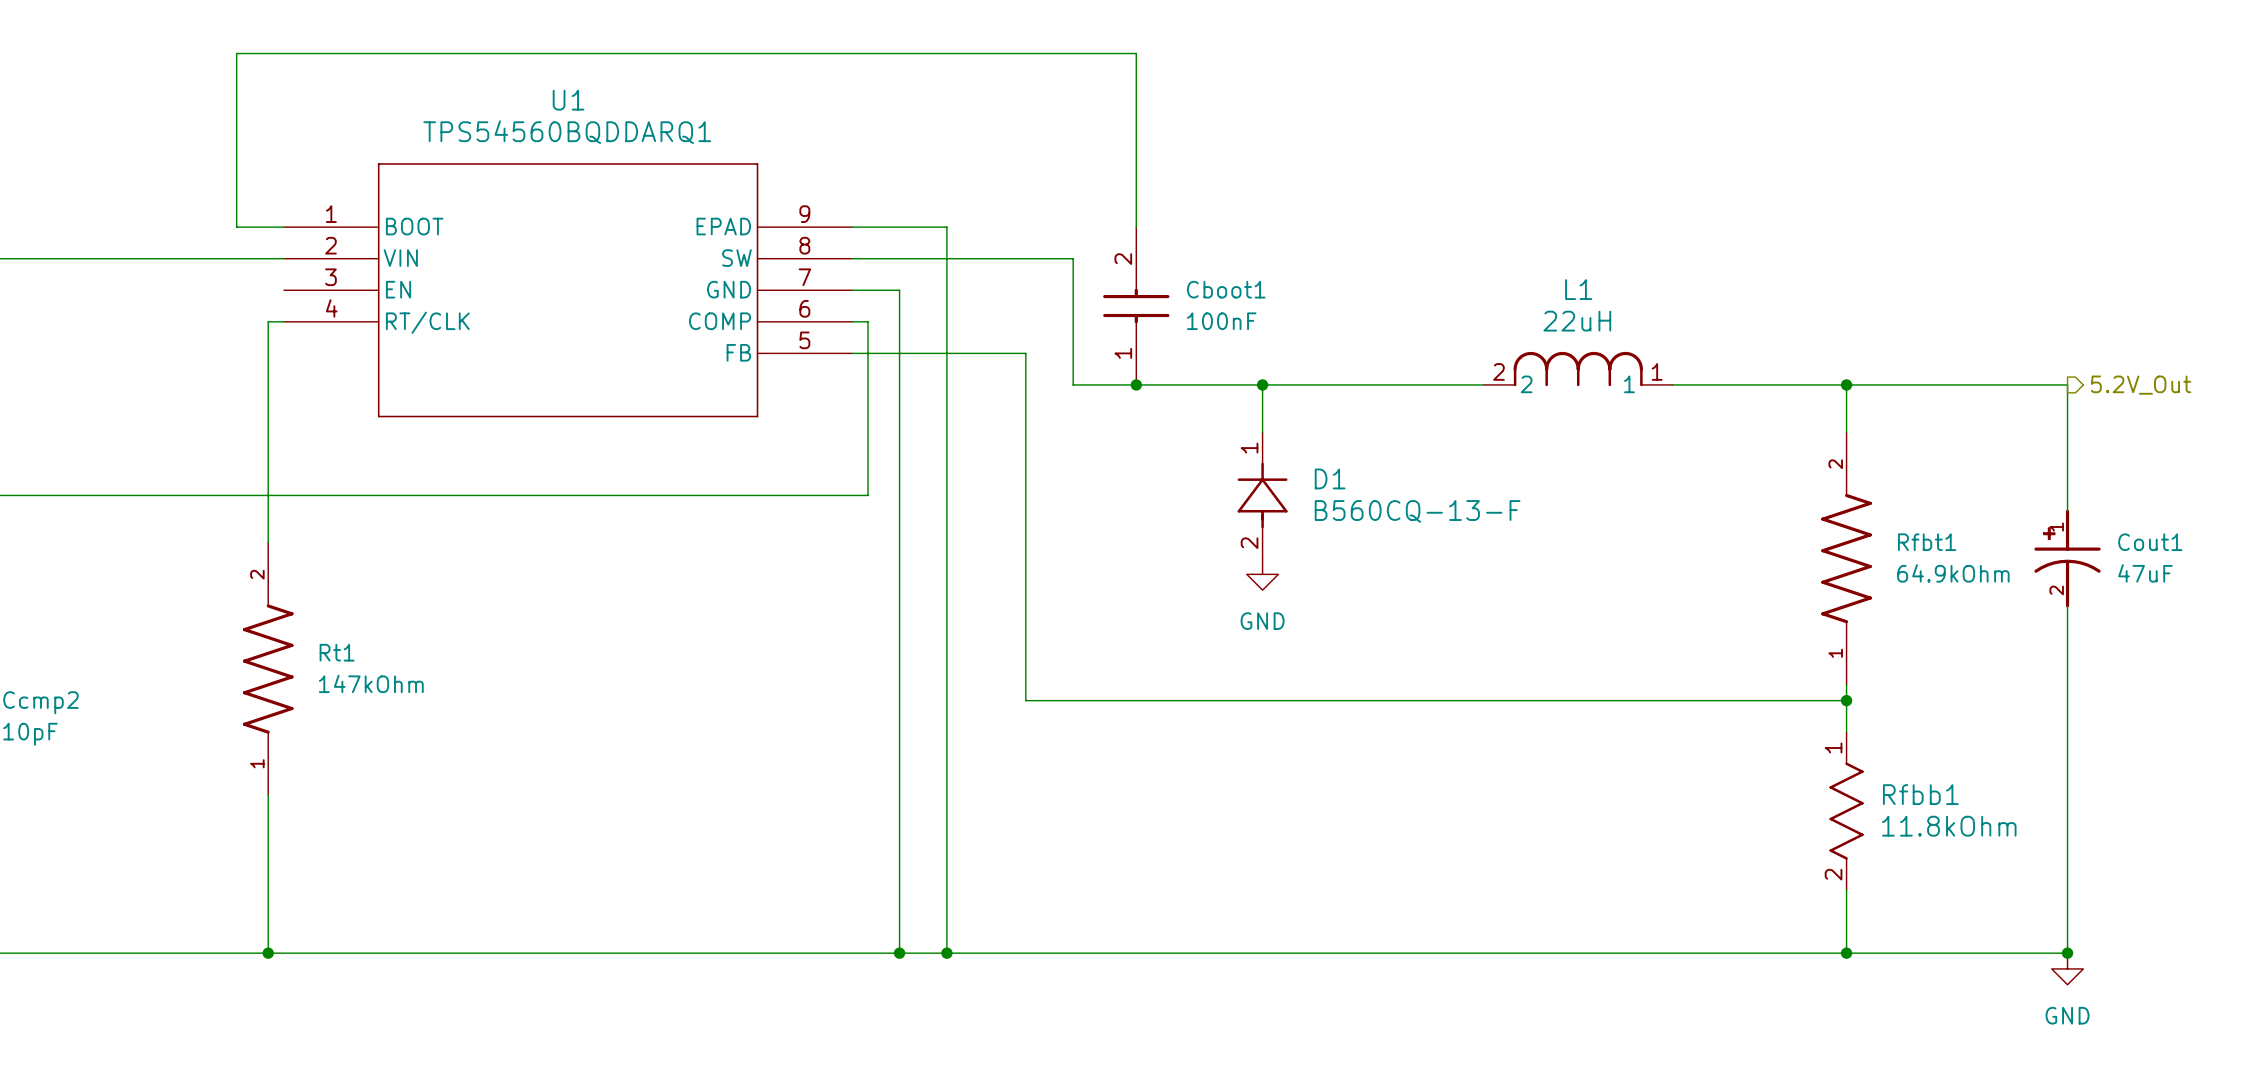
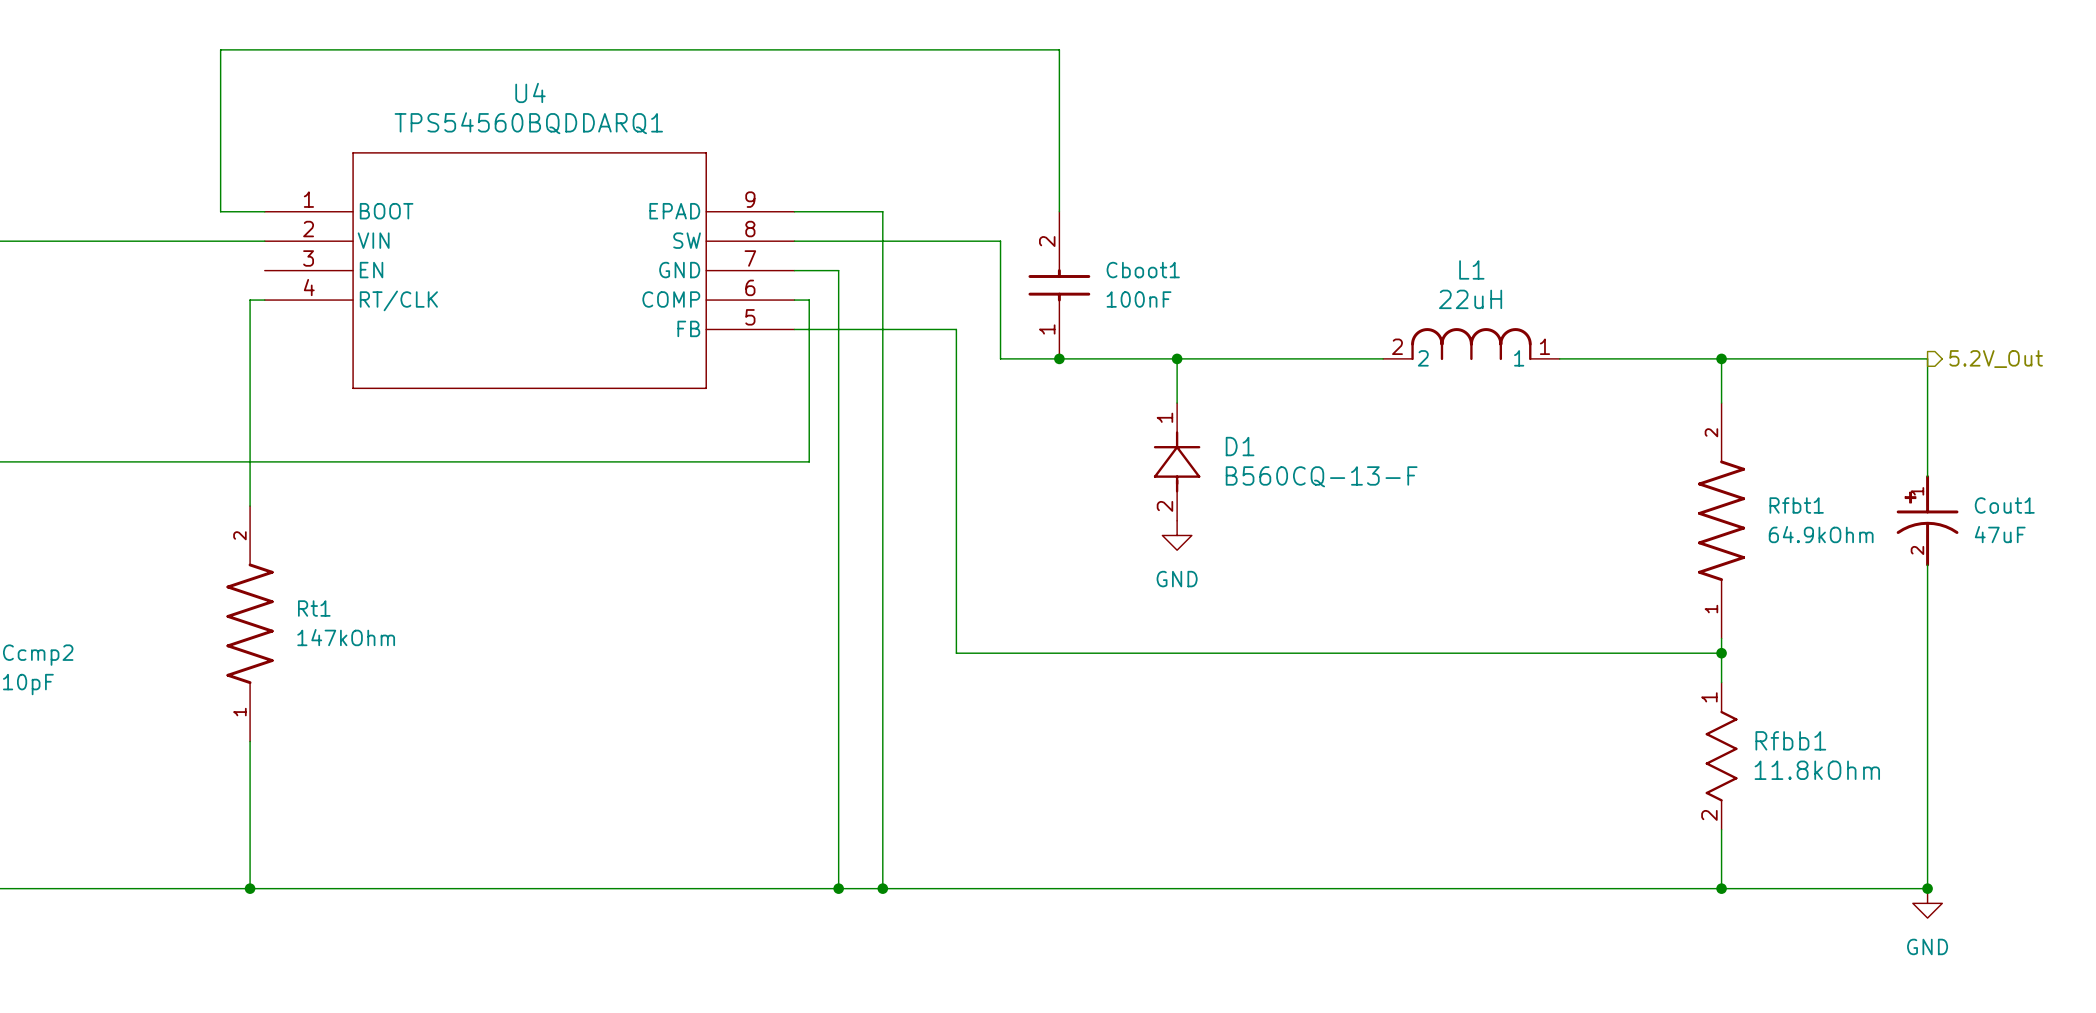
U1 name: U1 (568, 100) -> U4 (530, 92)

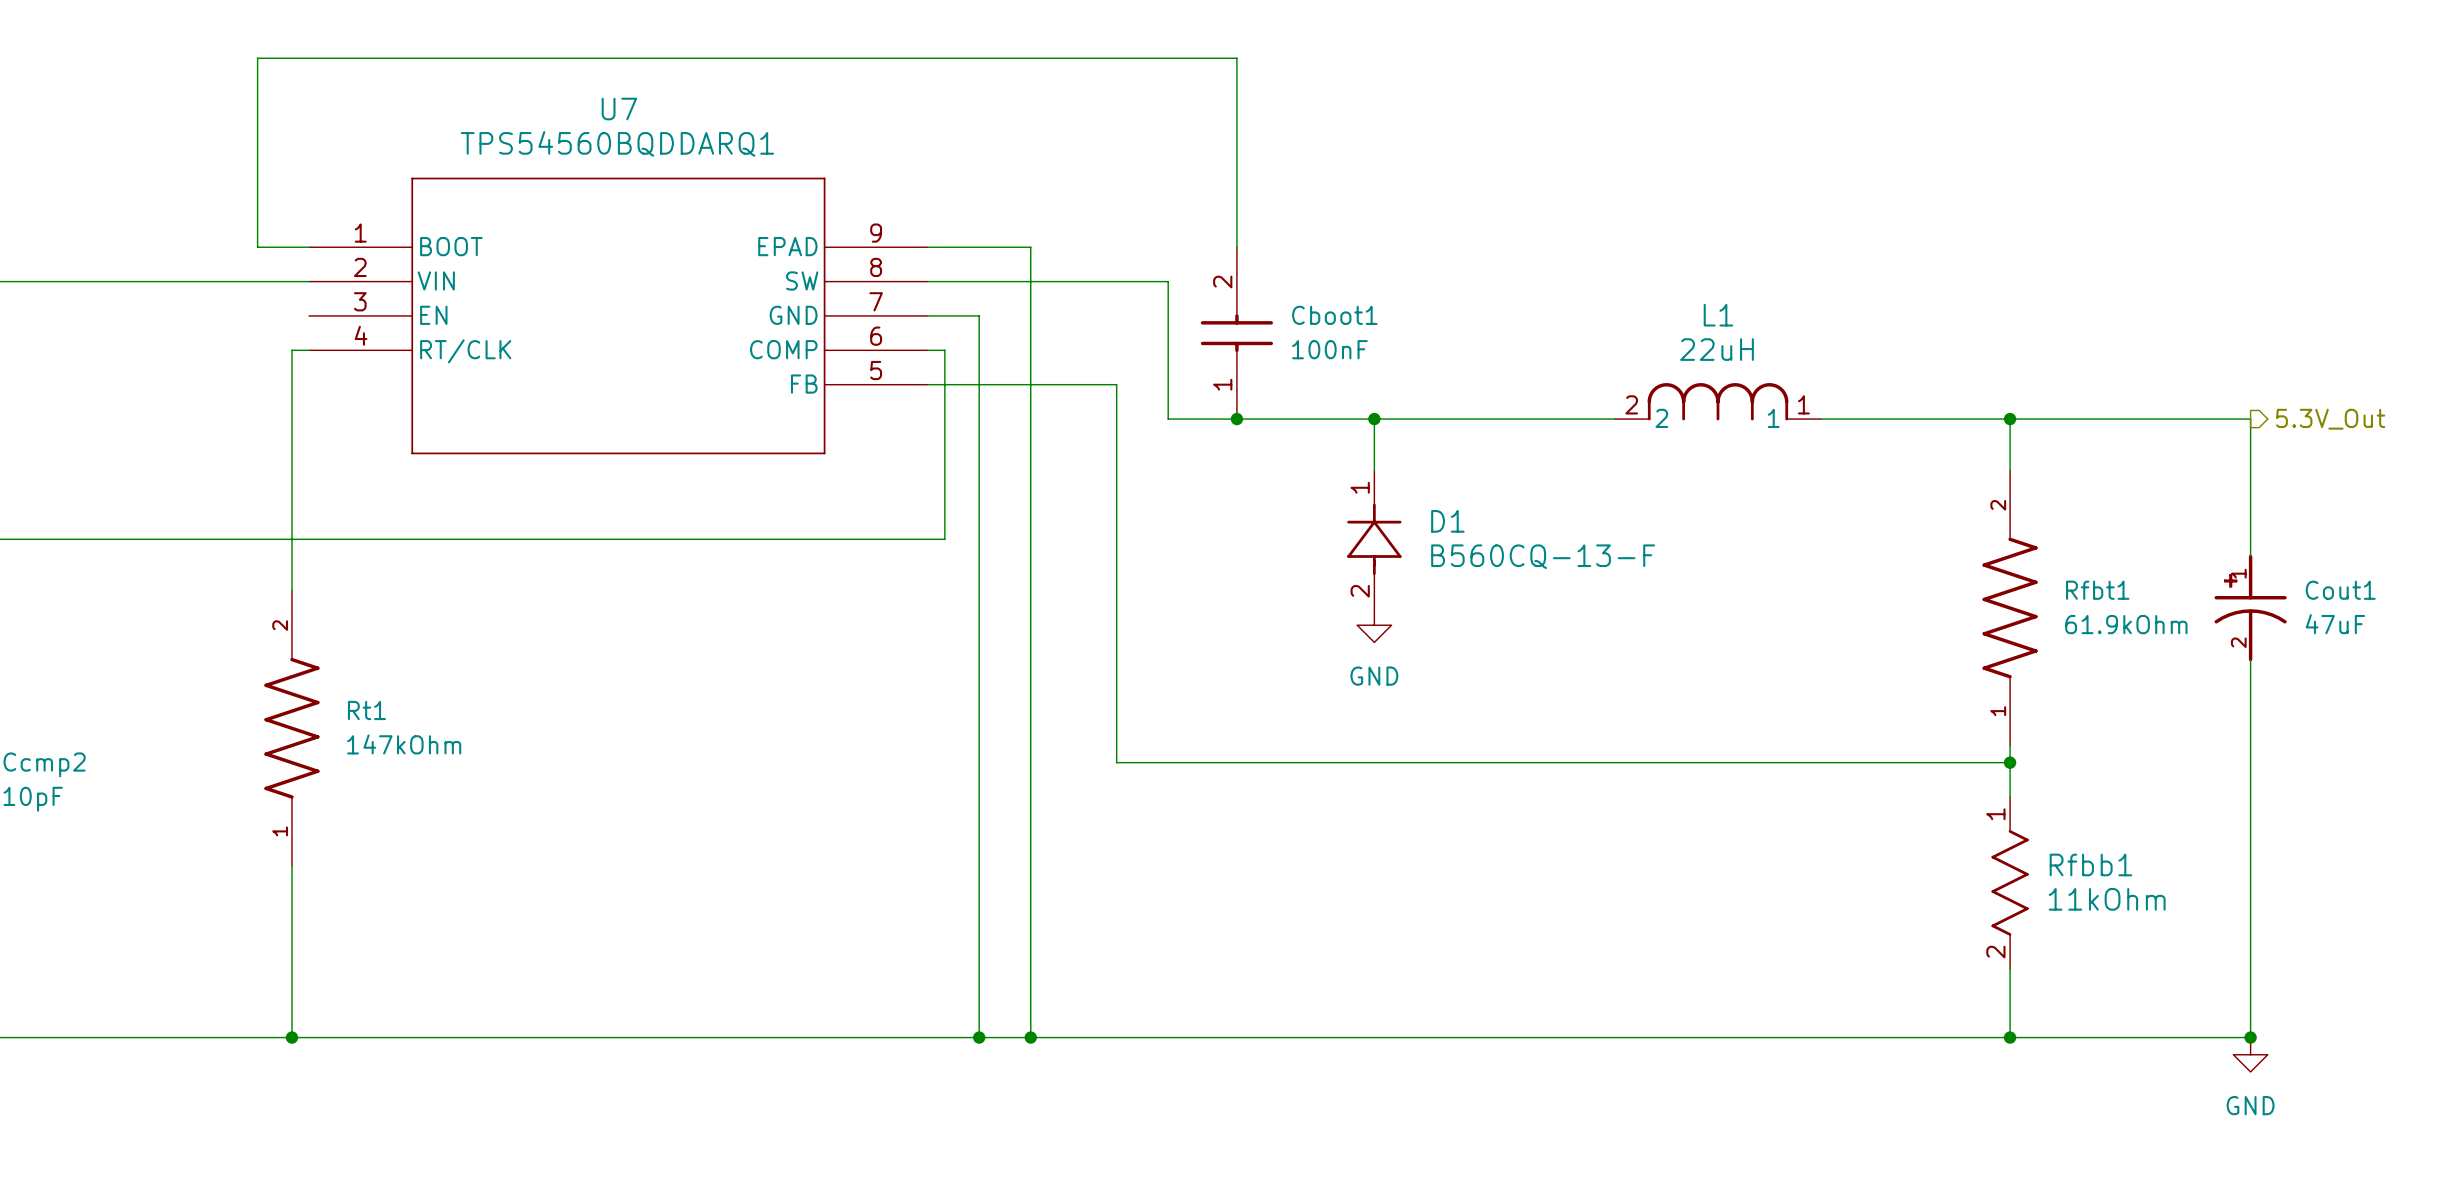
U4 name: U4 (530, 92) -> U7 (619, 109)
hierarchical label: 5.2V_Out (1996, 359) -> 5.3V_Out (2330, 419)
Rfbt1 value: 64.9kOhm (1821, 534) -> 61.9kOhm (2126, 624)
Rfbb1 value: 11.8kOhm (1817, 770) -> 11kOhm (2107, 899)

